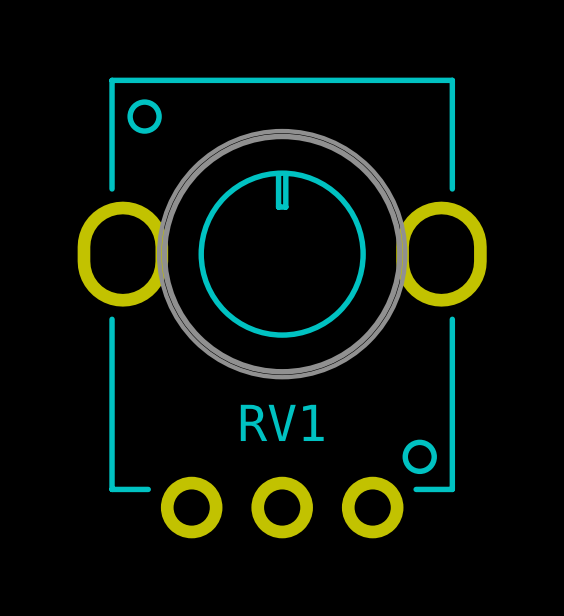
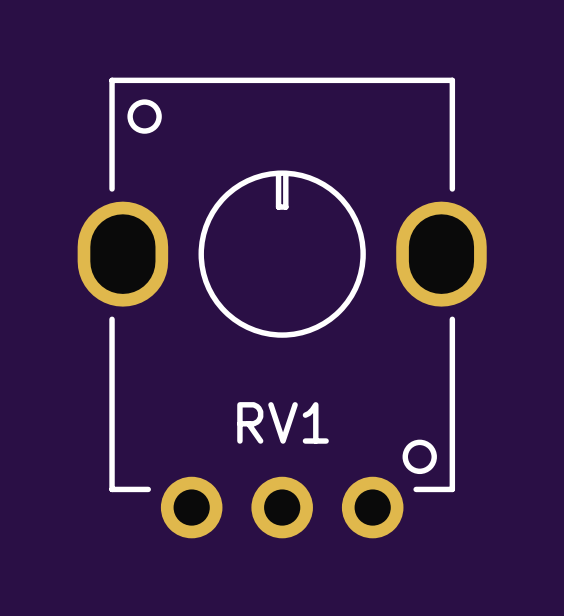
RV1 footprint: [77, 77, 487, 539] -> [77, 77, 487, 539]
drawing: [156, 128, 408, 380] -> none

